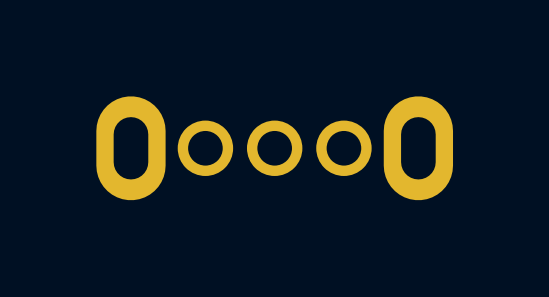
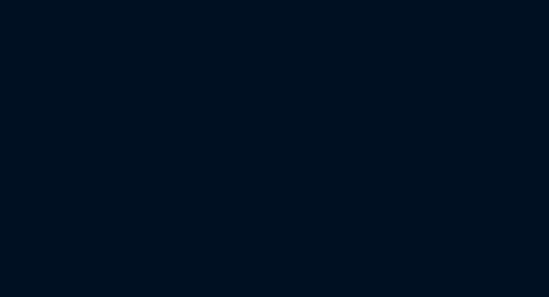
part: (274, 148) -> none

